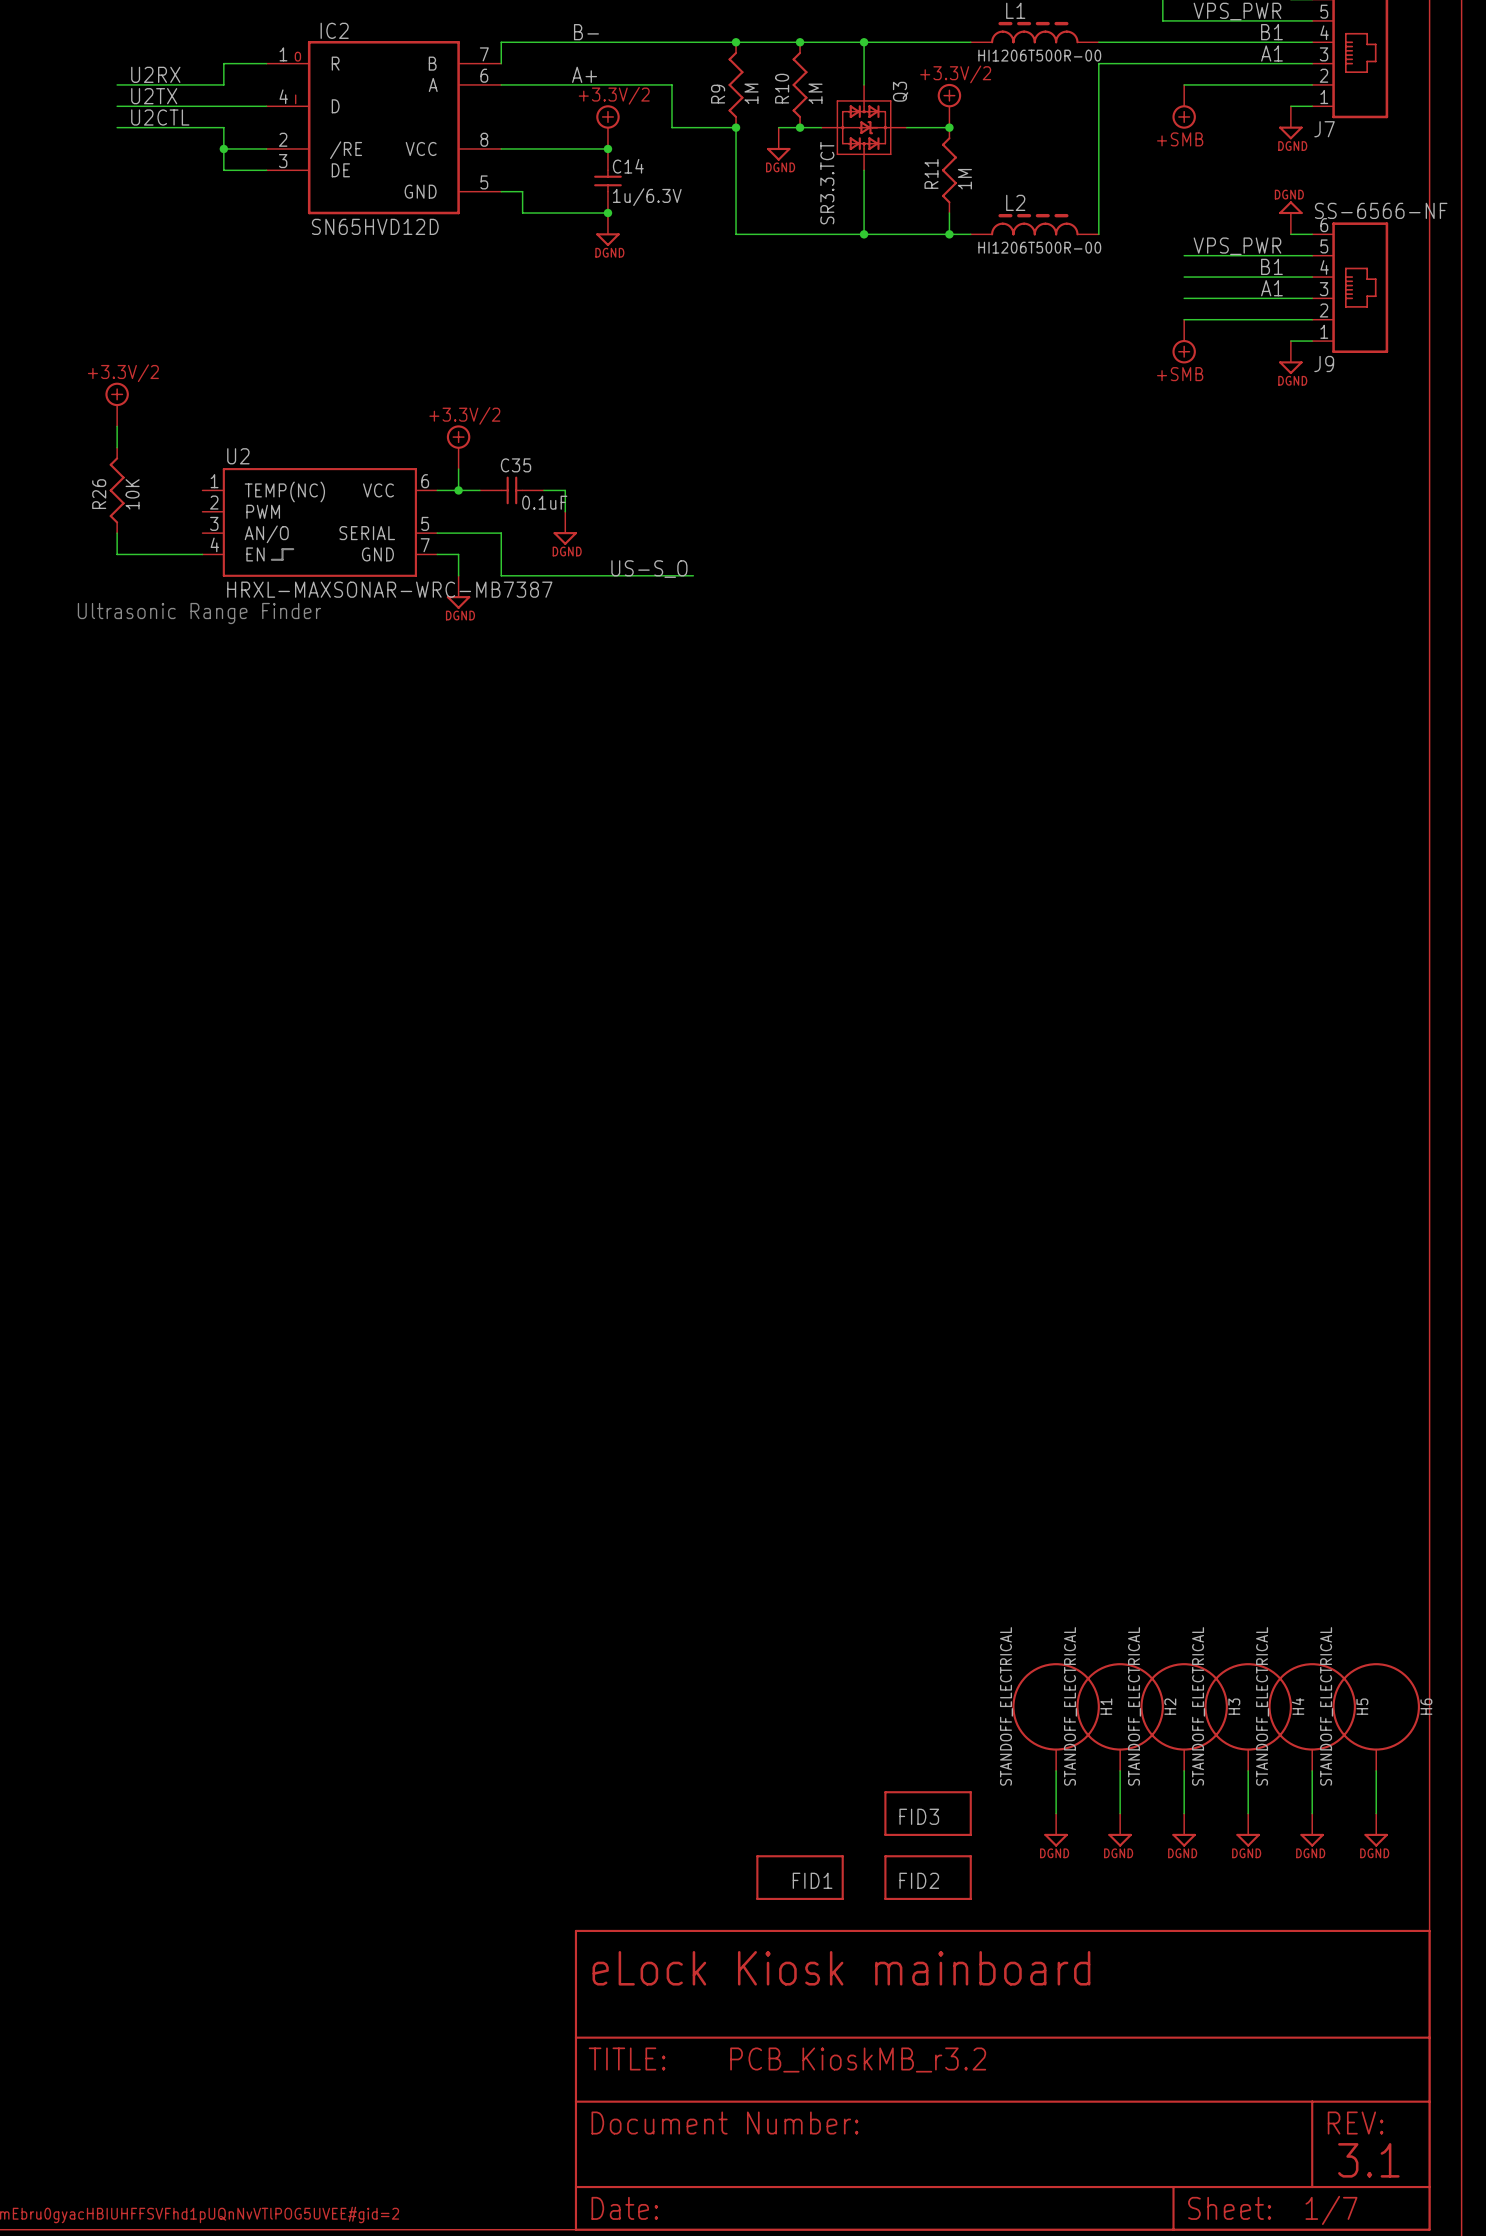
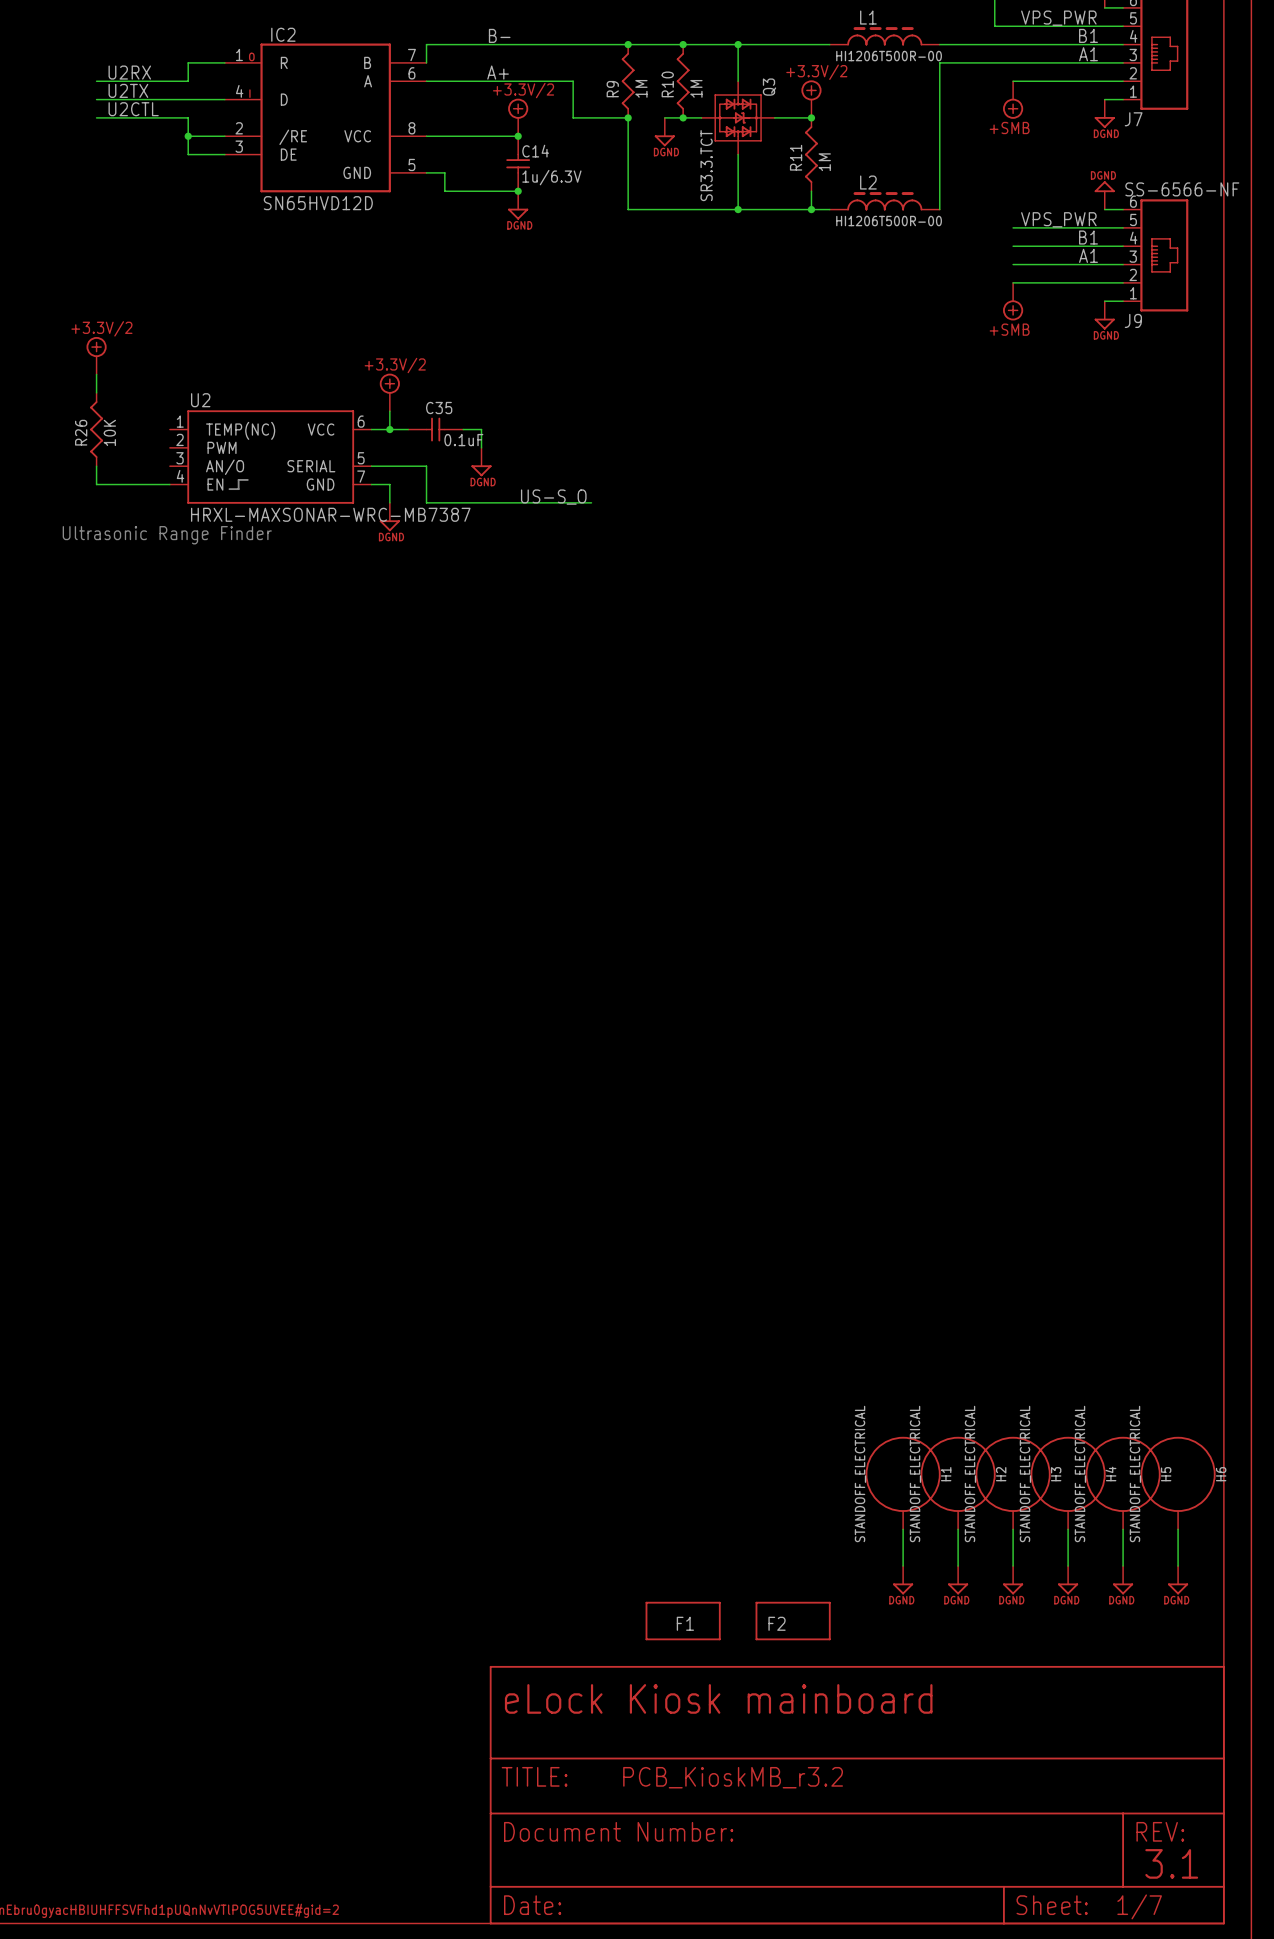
FID3: (928, 1813) -> none
FID1 name: FID1 (812, 1880) -> F1 (685, 1623)
FID2 name: FID2 (919, 1880) -> F2 (777, 1623)

